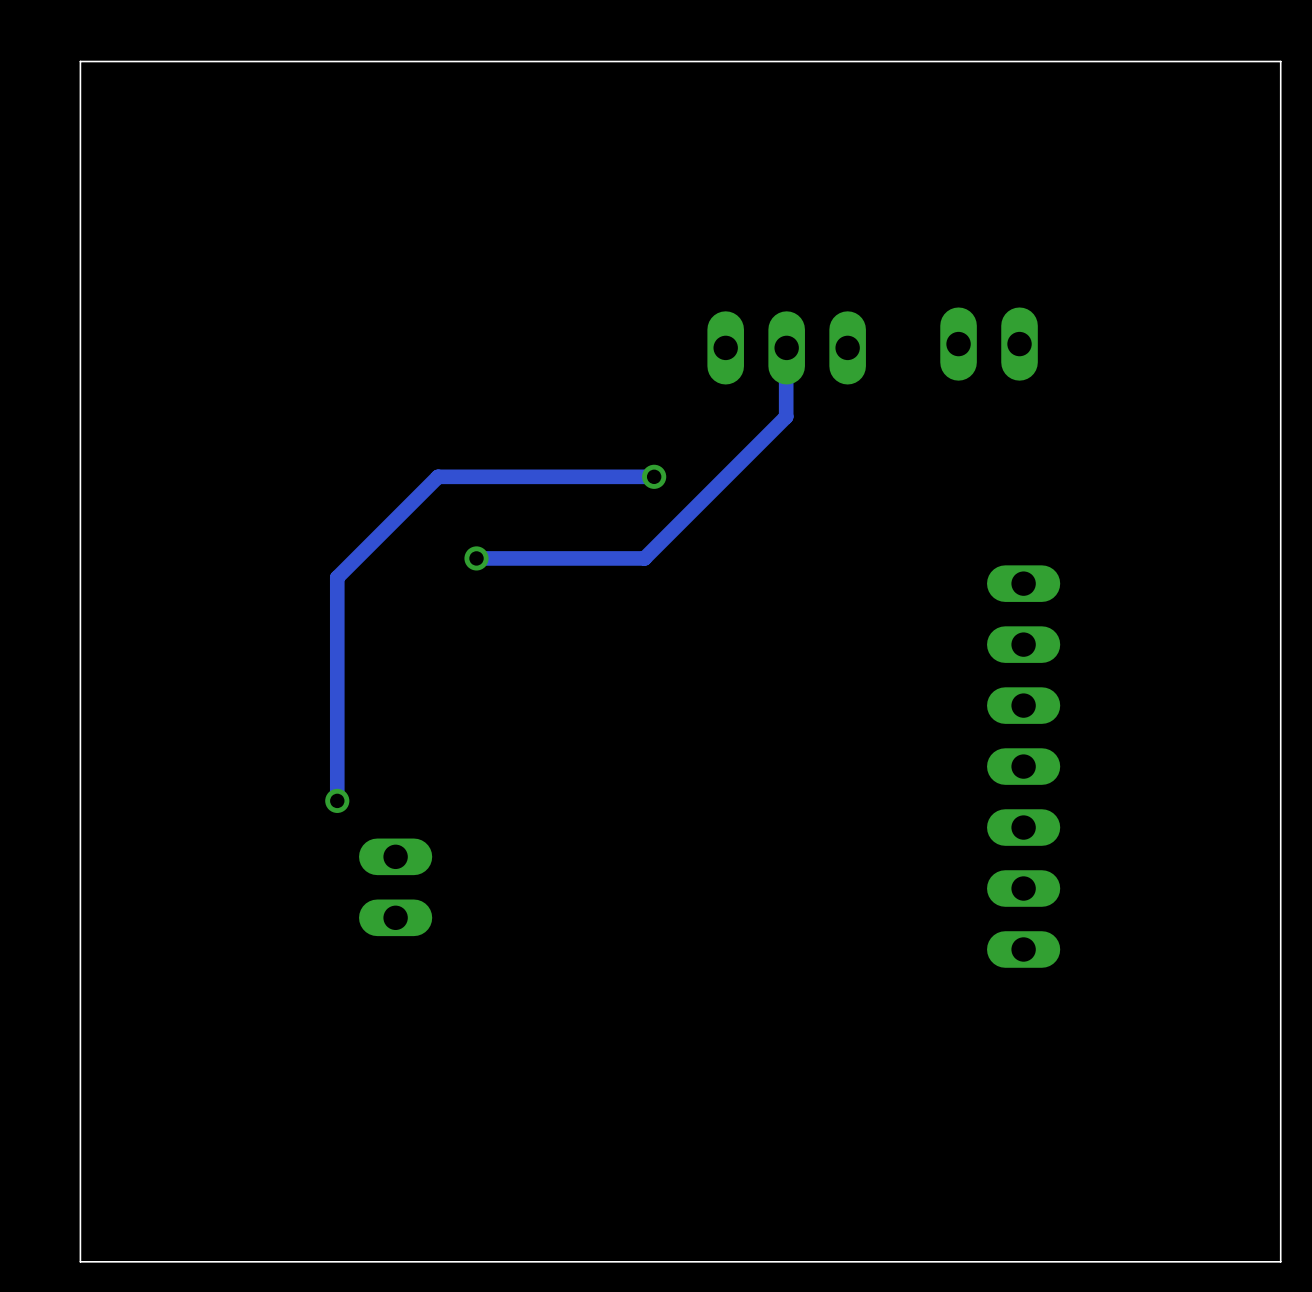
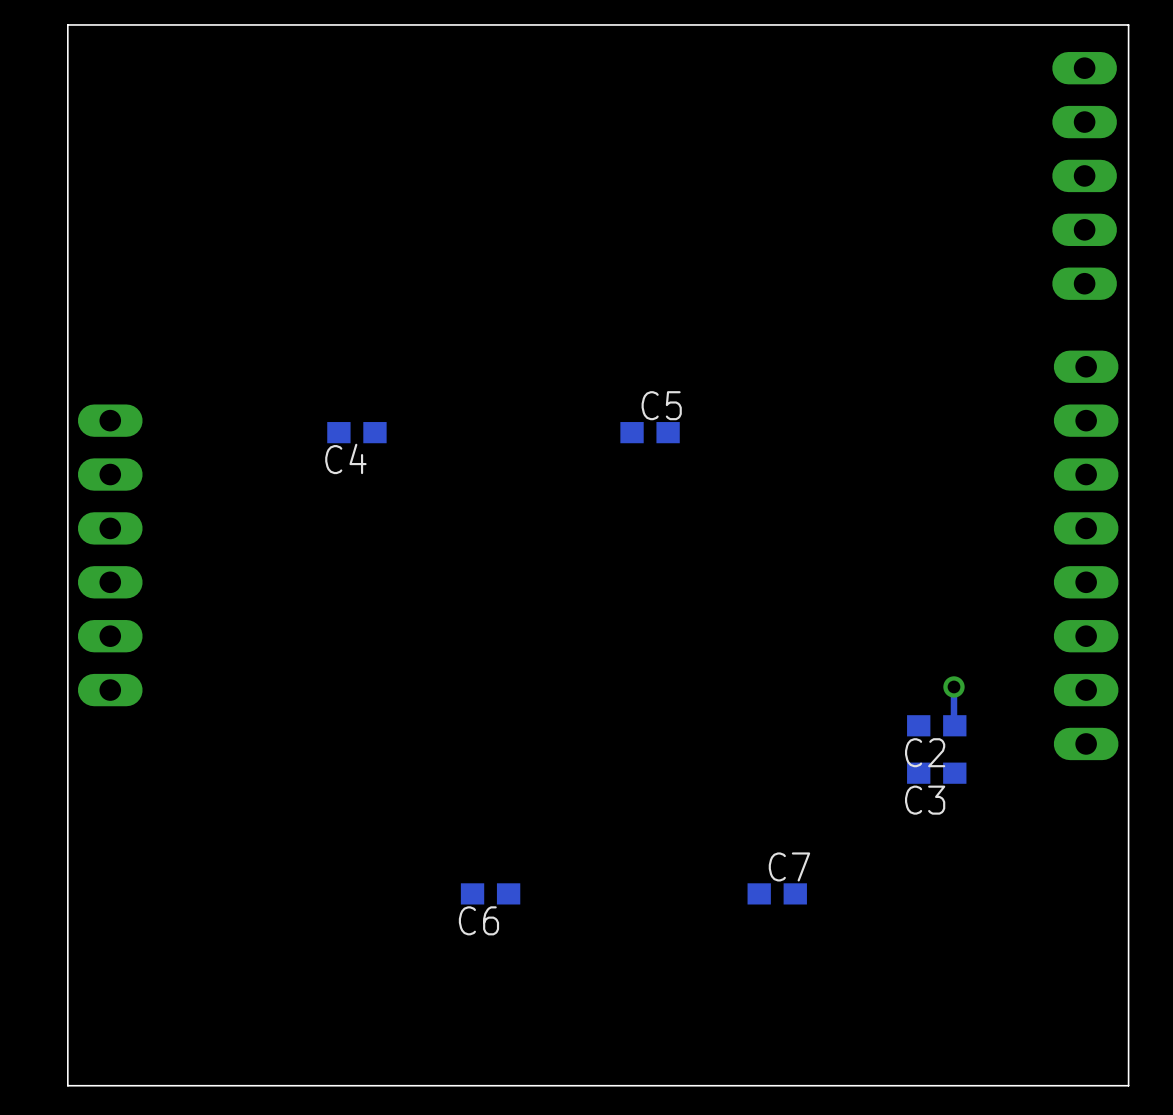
part: none -> (1084, 175)
part: (989, 344) -> none
track: (786, 347) (786, 416) (644, 558) (476, 558) -> none
part: (786, 347) -> none
track: (654, 476) (438, 476) (337, 577) (337, 800) -> none
via: (654, 476) -> none
C4: none -> (356, 432)
C5: none -> (650, 432)
via: (476, 558) -> none
part: none -> (110, 555)
part: none -> (1086, 555)
part: (1023, 766) -> none
via: (337, 800) -> none
track: none -> (953, 686) (954, 725)
via: none -> (953, 686)
C2: none -> (936, 725)
part: (395, 887) -> none
C3: none -> (936, 773)
C6: none -> (490, 893)
C7: none -> (777, 893)

